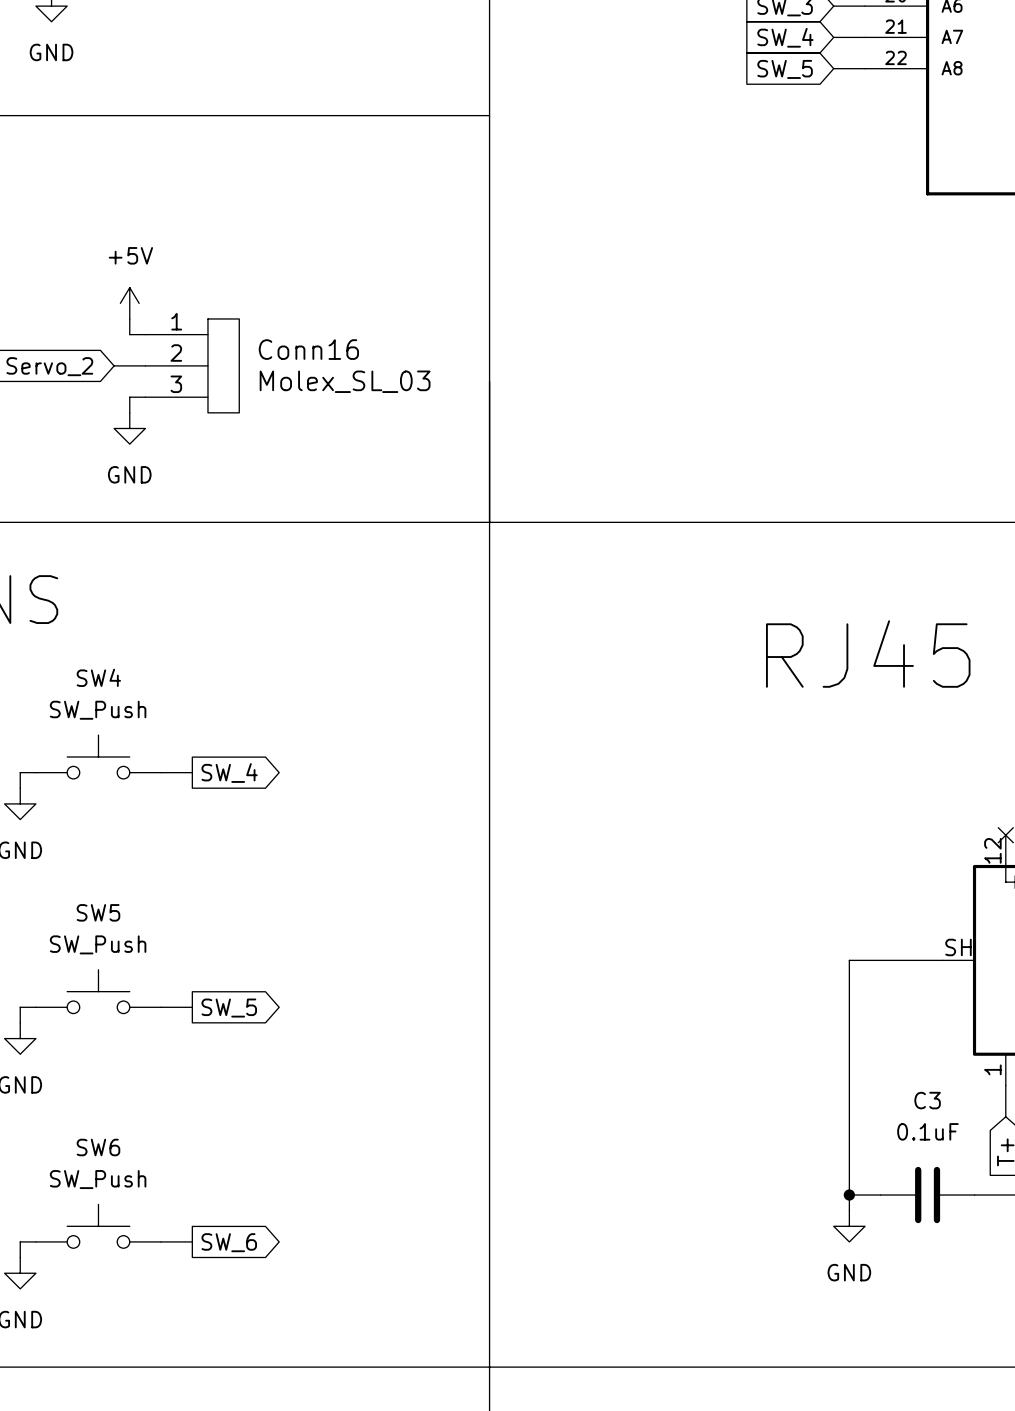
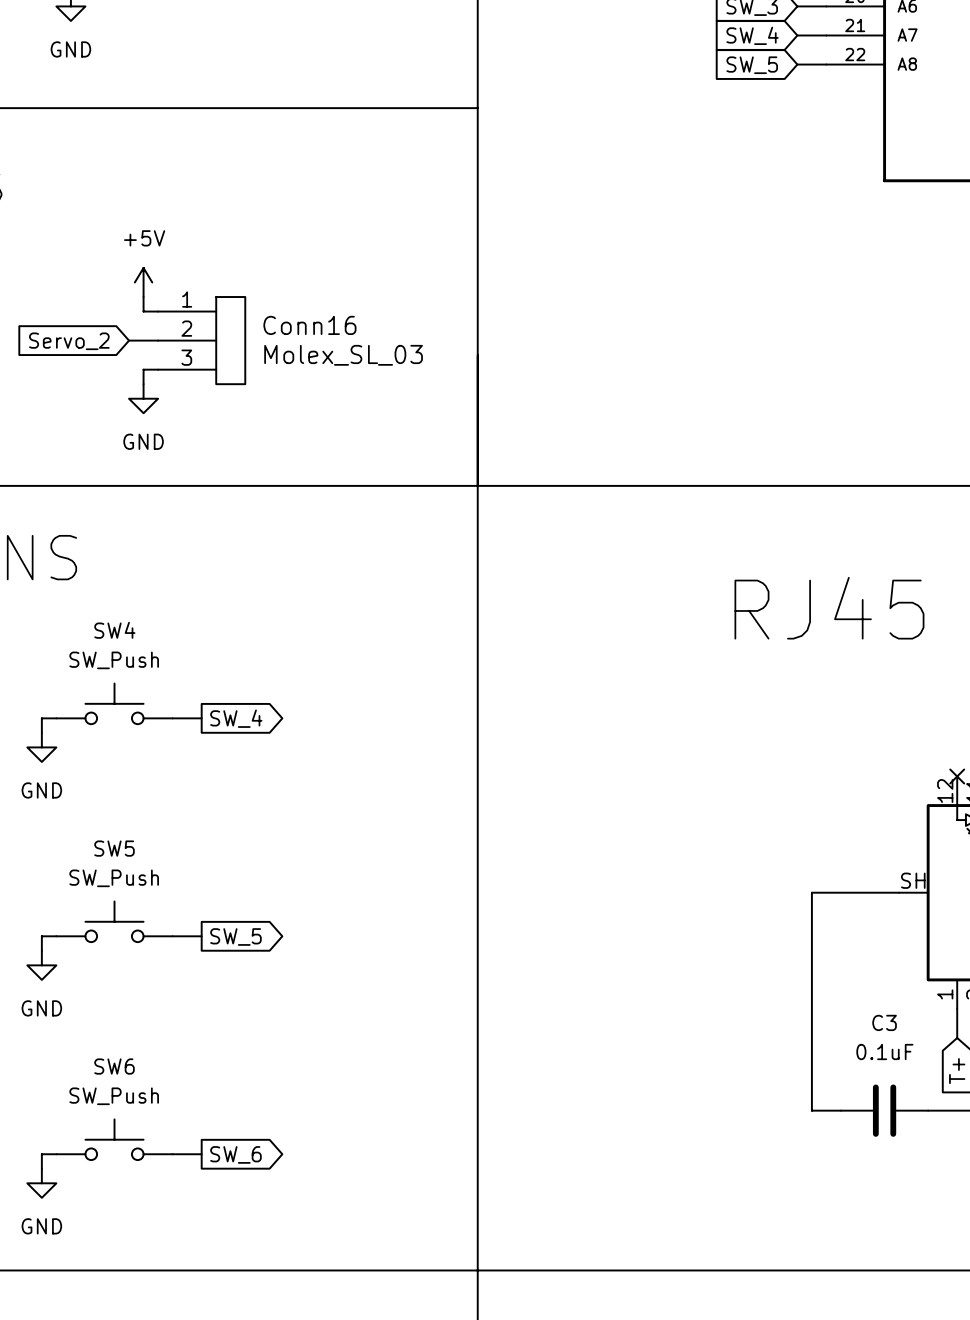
wire: (849, 1195) (849, 1210) -> none
junction: (849, 1195) -> none
power symbol: GND (849, 1226) -> none

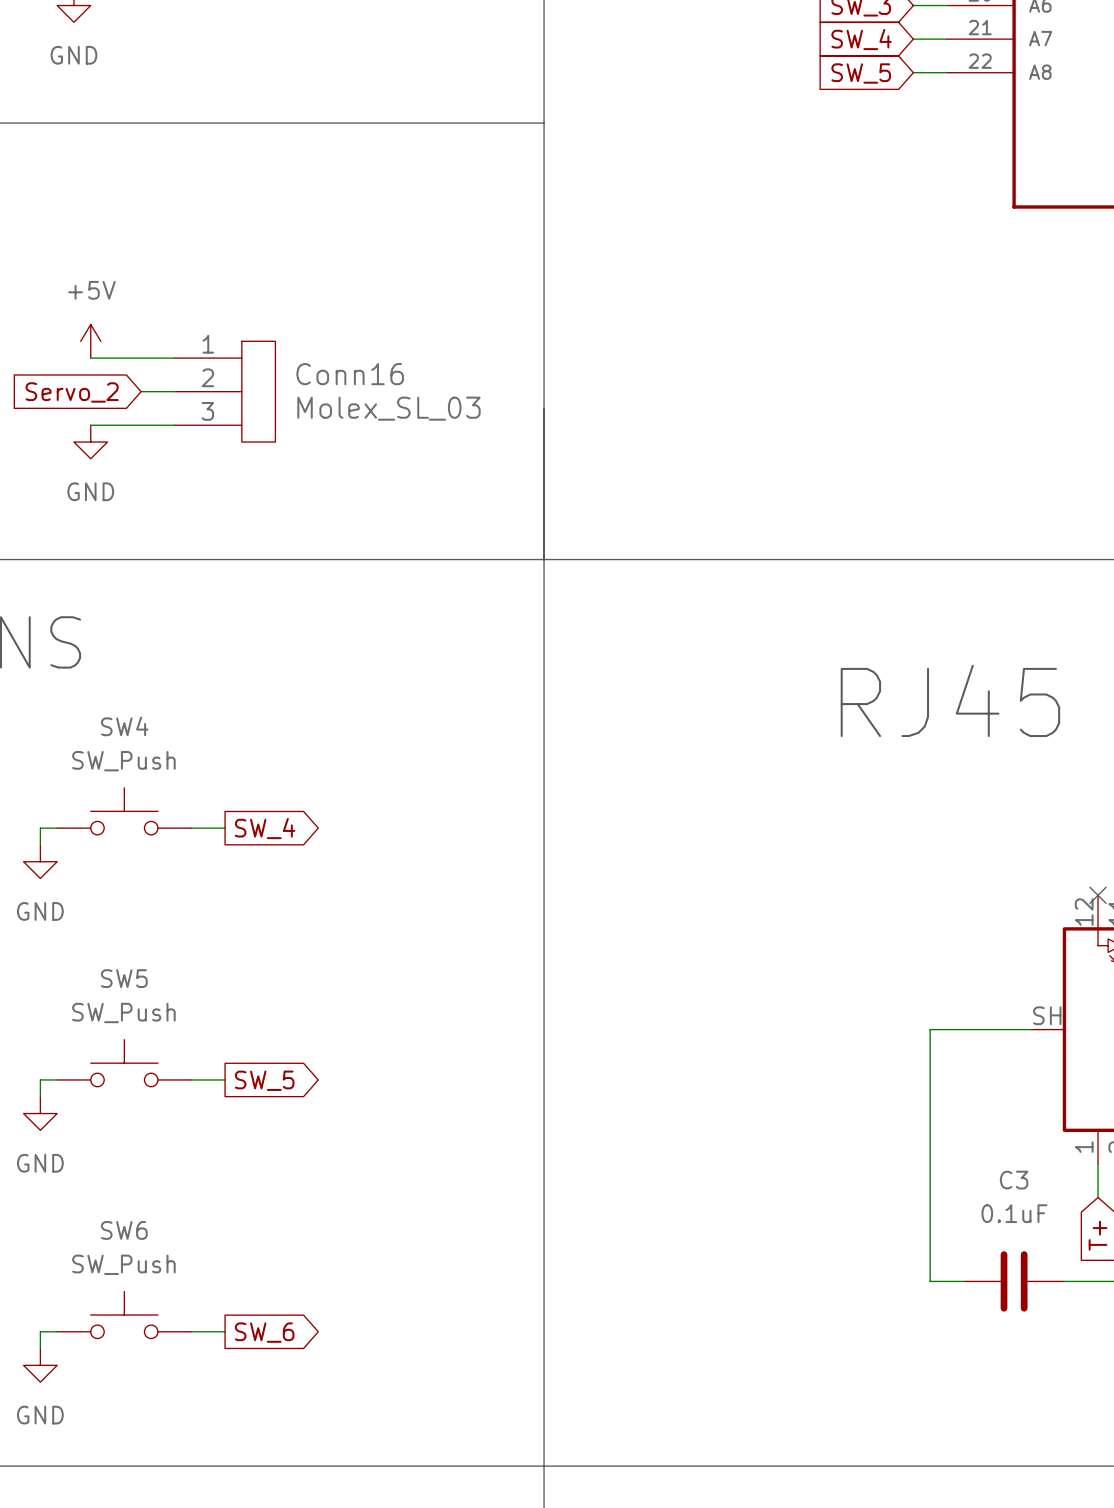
power symbol position: +5V (143, 282) -> +5V (90, 341)
wire: (143, 297) (143, 311) -> (90, 358) (157, 358)
wire: (143, 369) (143, 384) -> (157, 425) (90, 425)
power symbol position: GND (143, 398) -> GND (90, 442)

